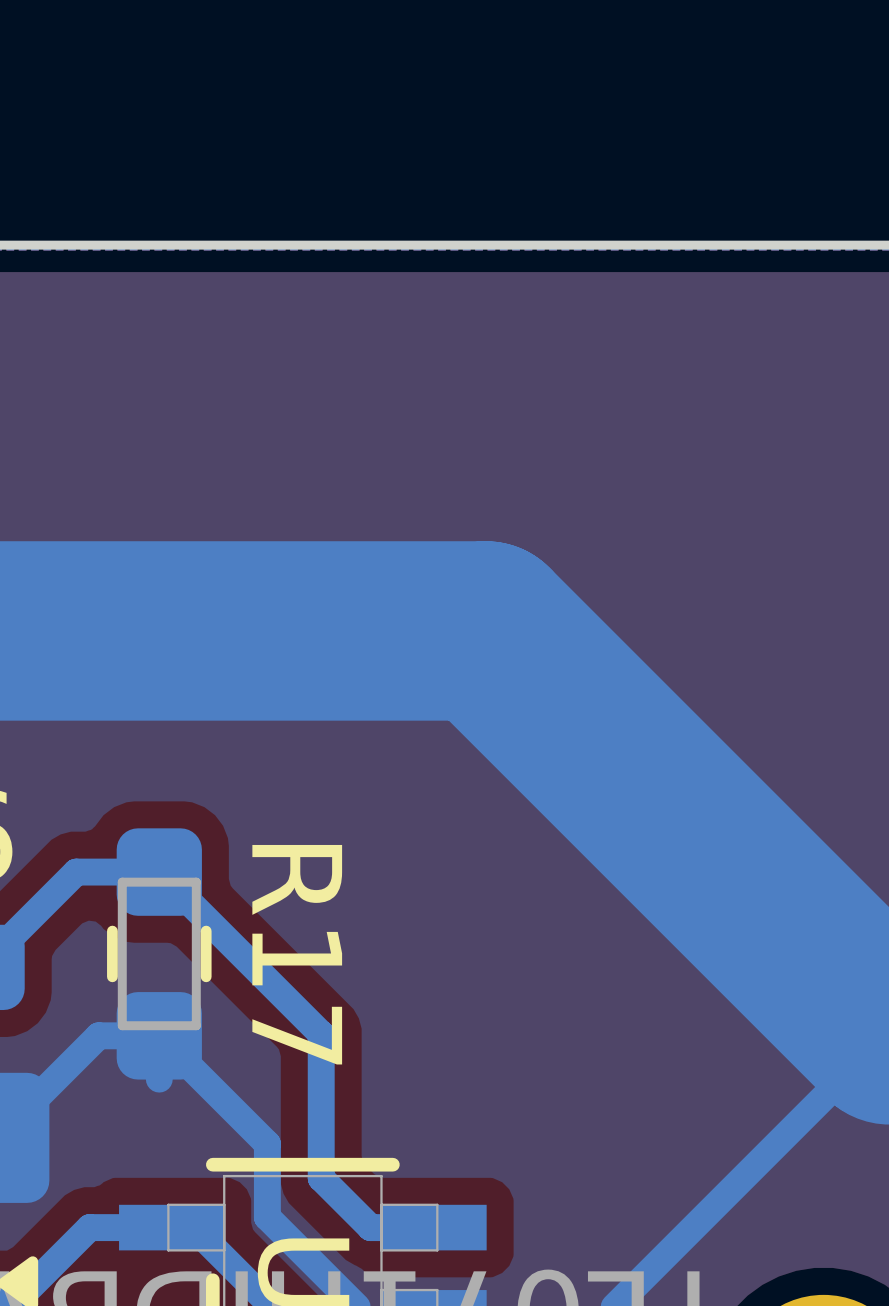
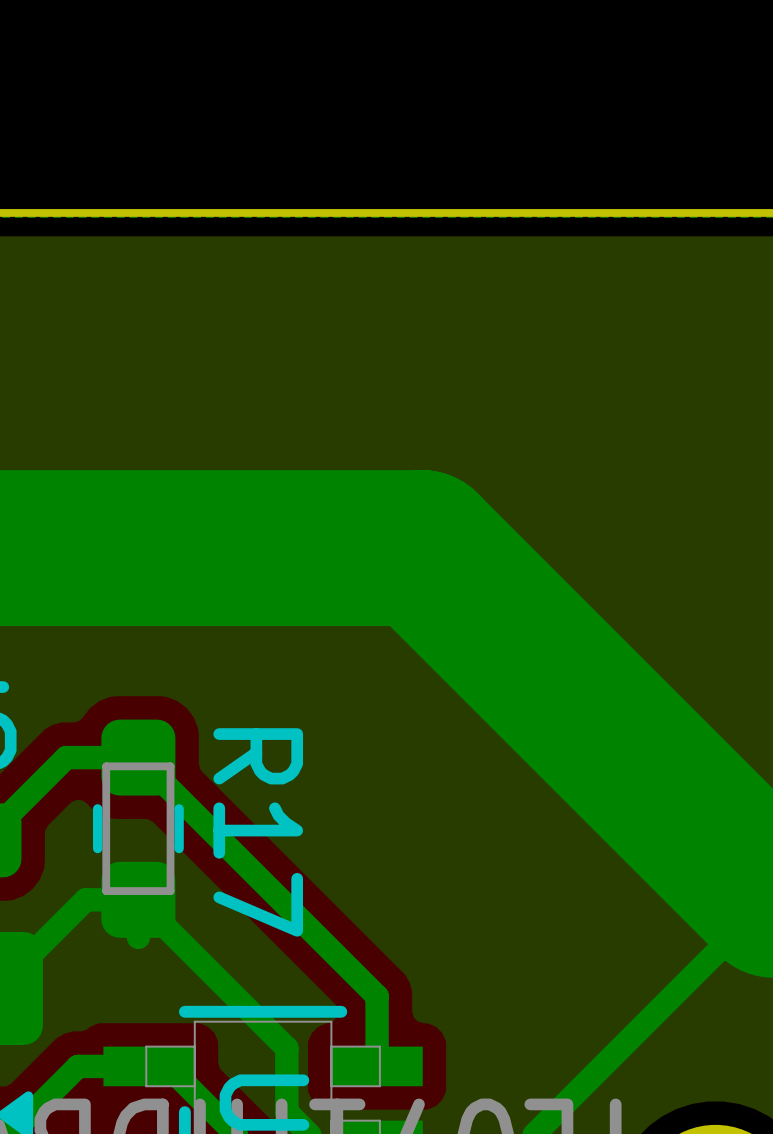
bottom track: (321, 1033) (321, 1178) (370, 1227) (434, 1227) -> (279, 898) (377, 996) (377, 1066)
bottom track: (267, 1143) (267, 1217) (330, 1280) -> (232, 993) (286, 1048) (286, 1111)

